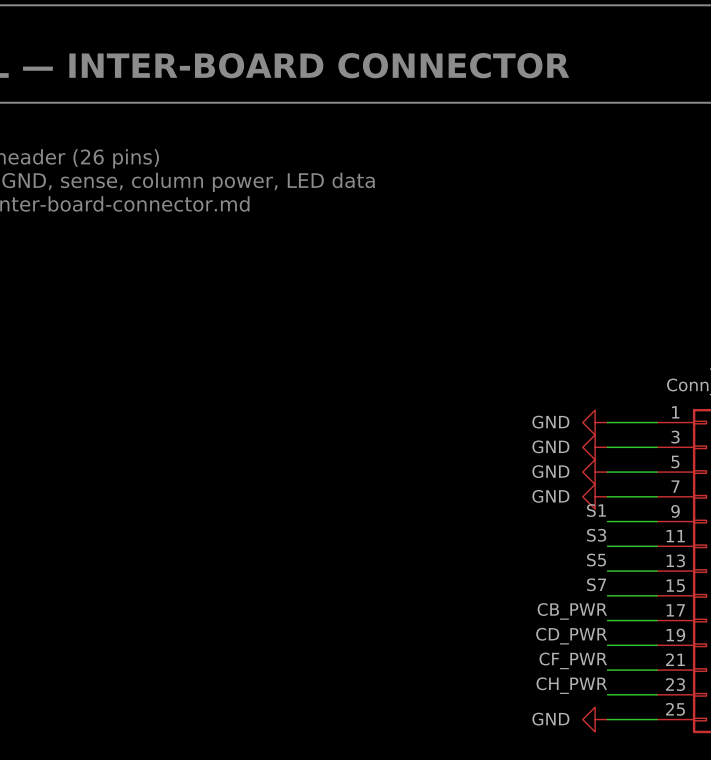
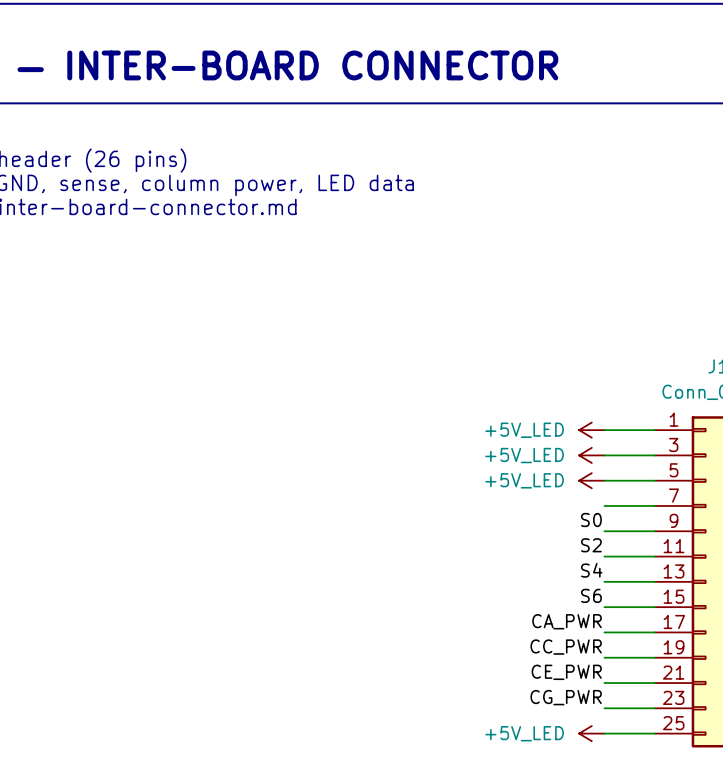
power symbol: GND (595, 422) -> +5V_LED (591, 430)
power symbol: GND (595, 447) -> +5V_LED (591, 455)
power symbol: GND (595, 472) -> +5V_LED (591, 480)
power symbol: GND (595, 496) -> none
label: S1 (596, 510) -> S0 (591, 520)
label: S3 (596, 535) -> S2 (591, 545)
label: S5 (596, 560) -> S4 (591, 570)
label: S7 (596, 584) -> S6 (591, 595)
label: CB_PWR (572, 611) -> CA_PWR (567, 621)
label: CD_PWR (571, 636) -> CC_PWR (566, 647)
label: CF_PWR (573, 660) -> CE_PWR (566, 672)
label: CH_PWR (571, 685) -> CG_PWR (566, 697)
power symbol: GND (595, 719) -> +5V_LED (591, 733)

